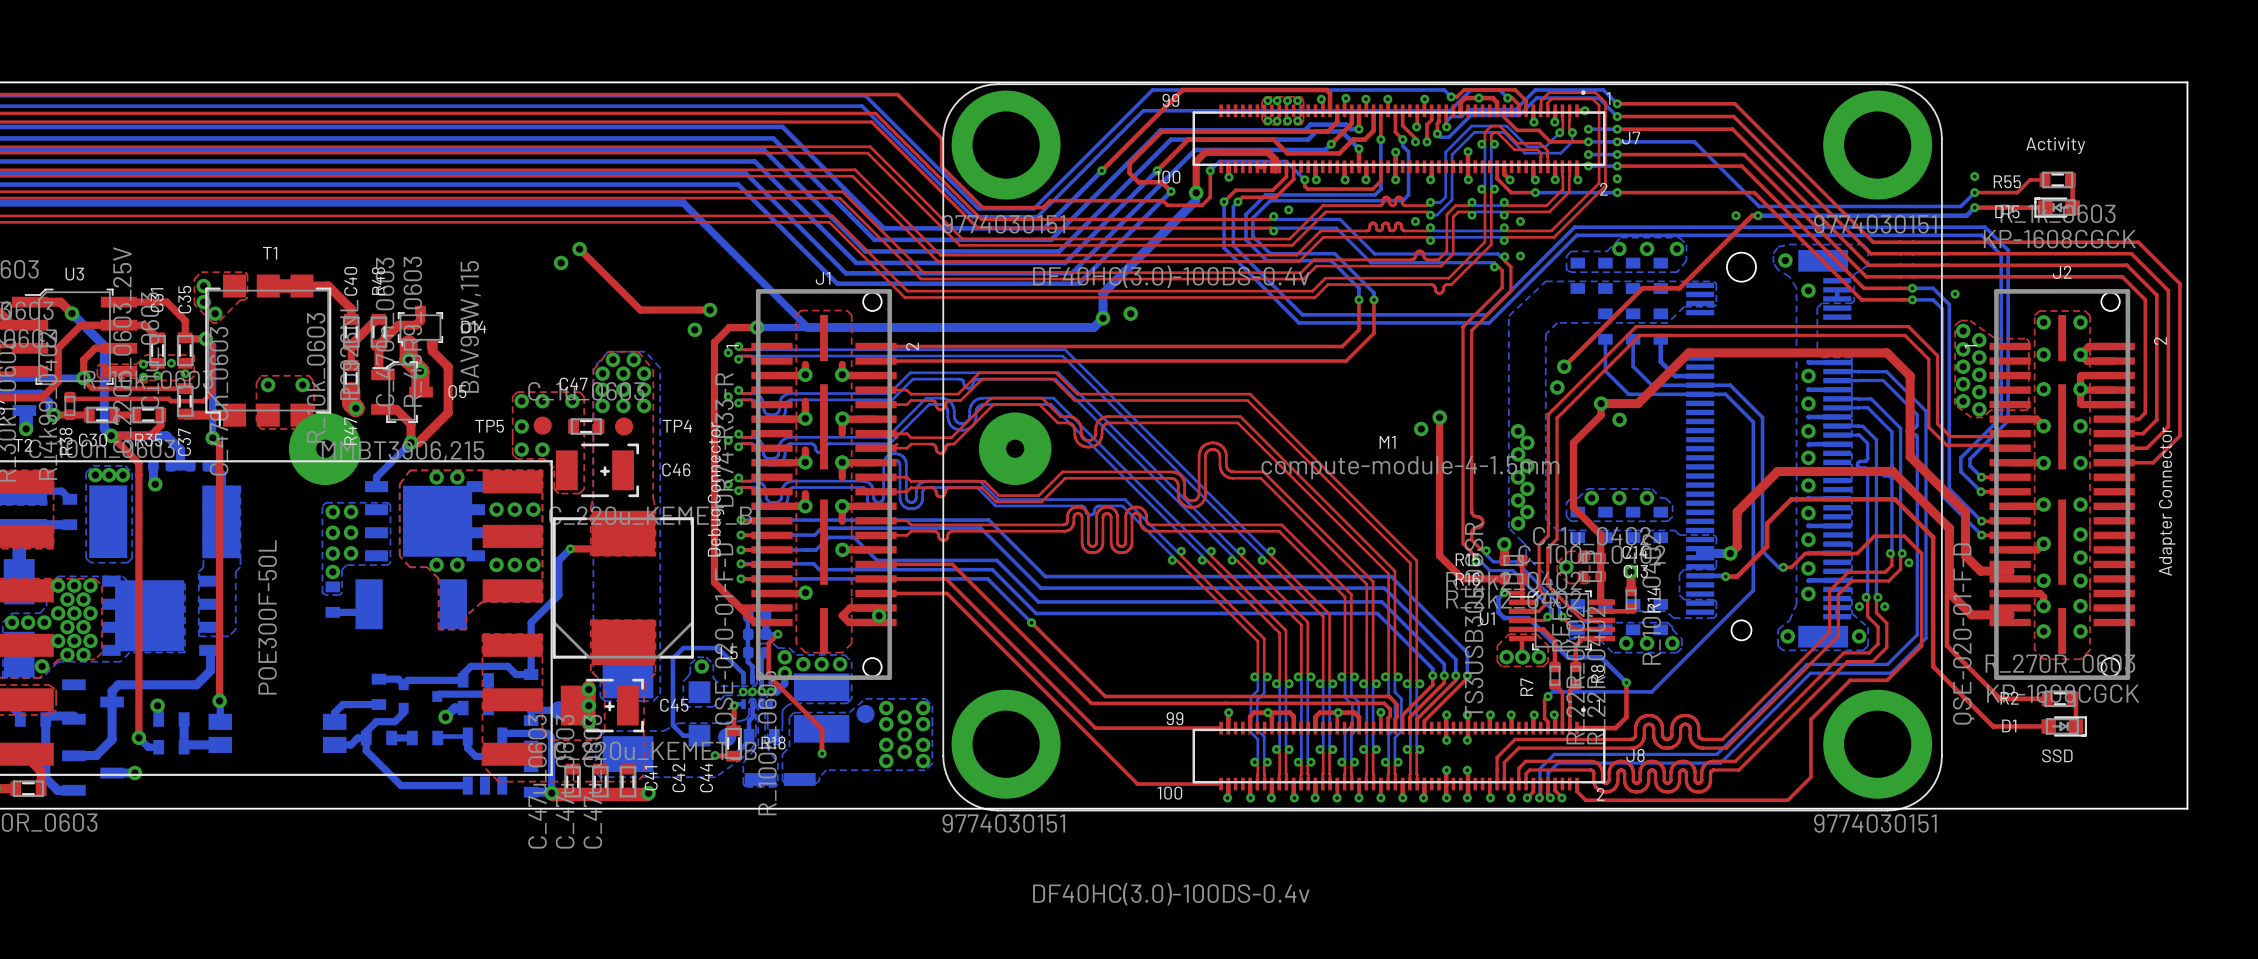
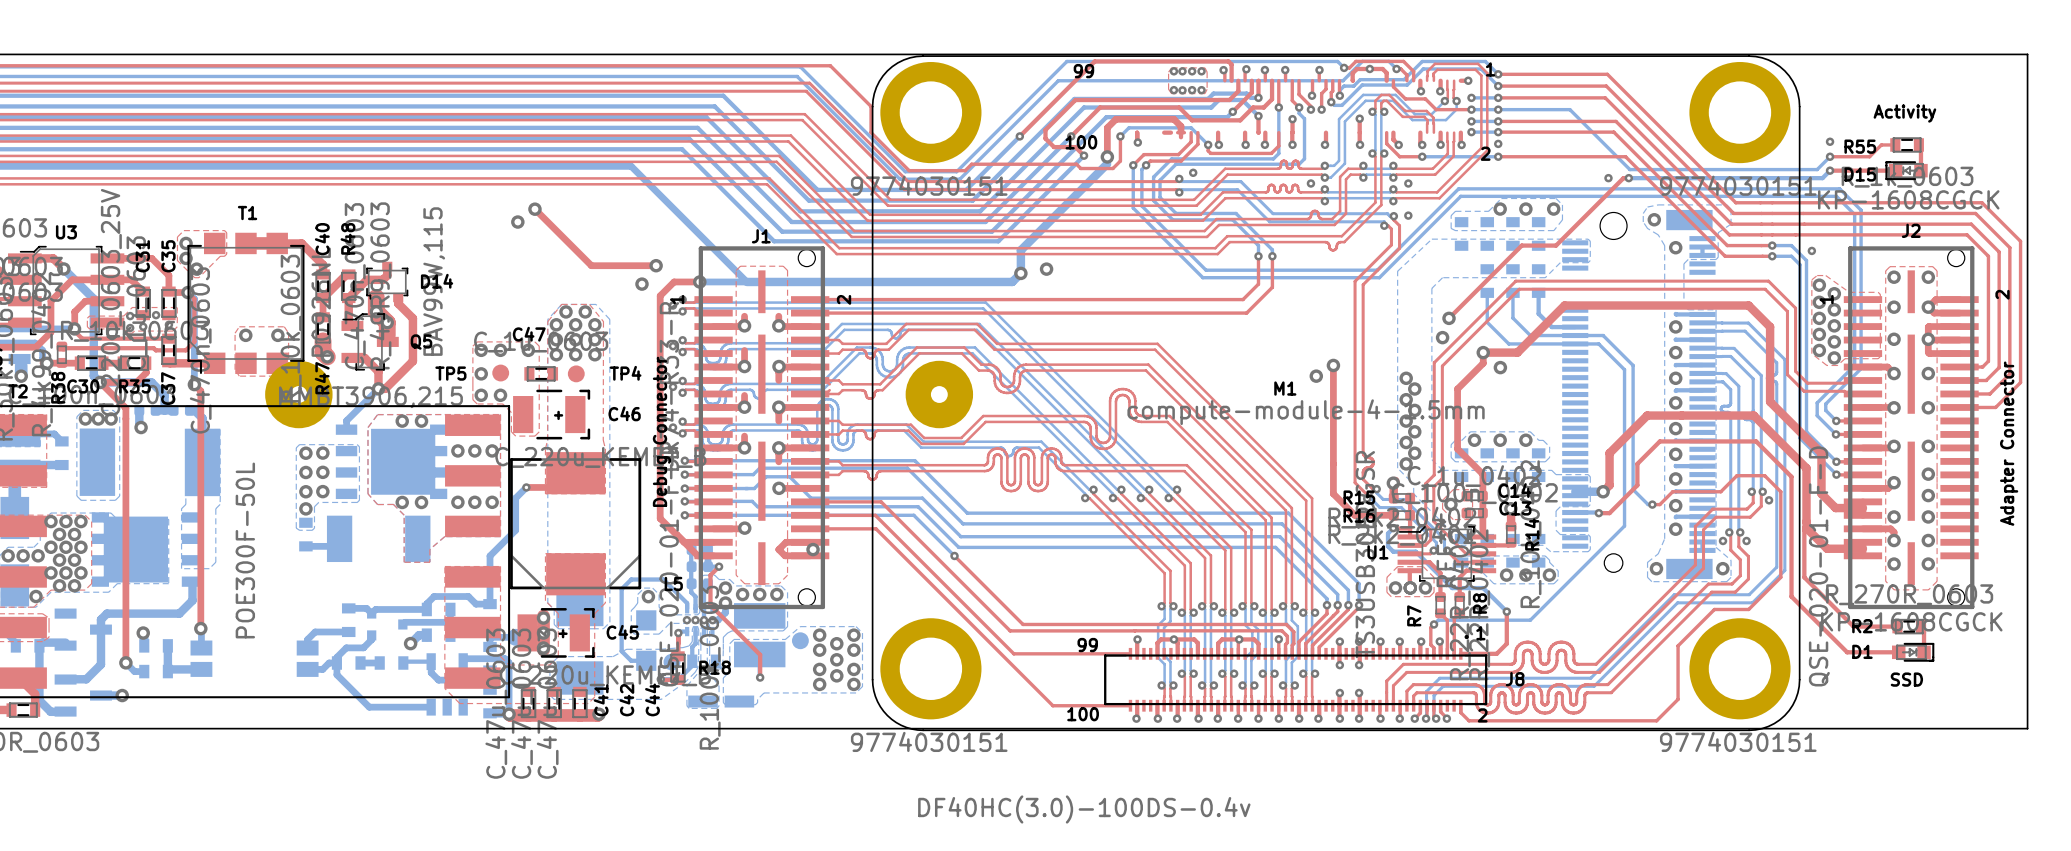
J7: DF40HC(3.0)-100DS-0.4v (1399, 131) -> none

